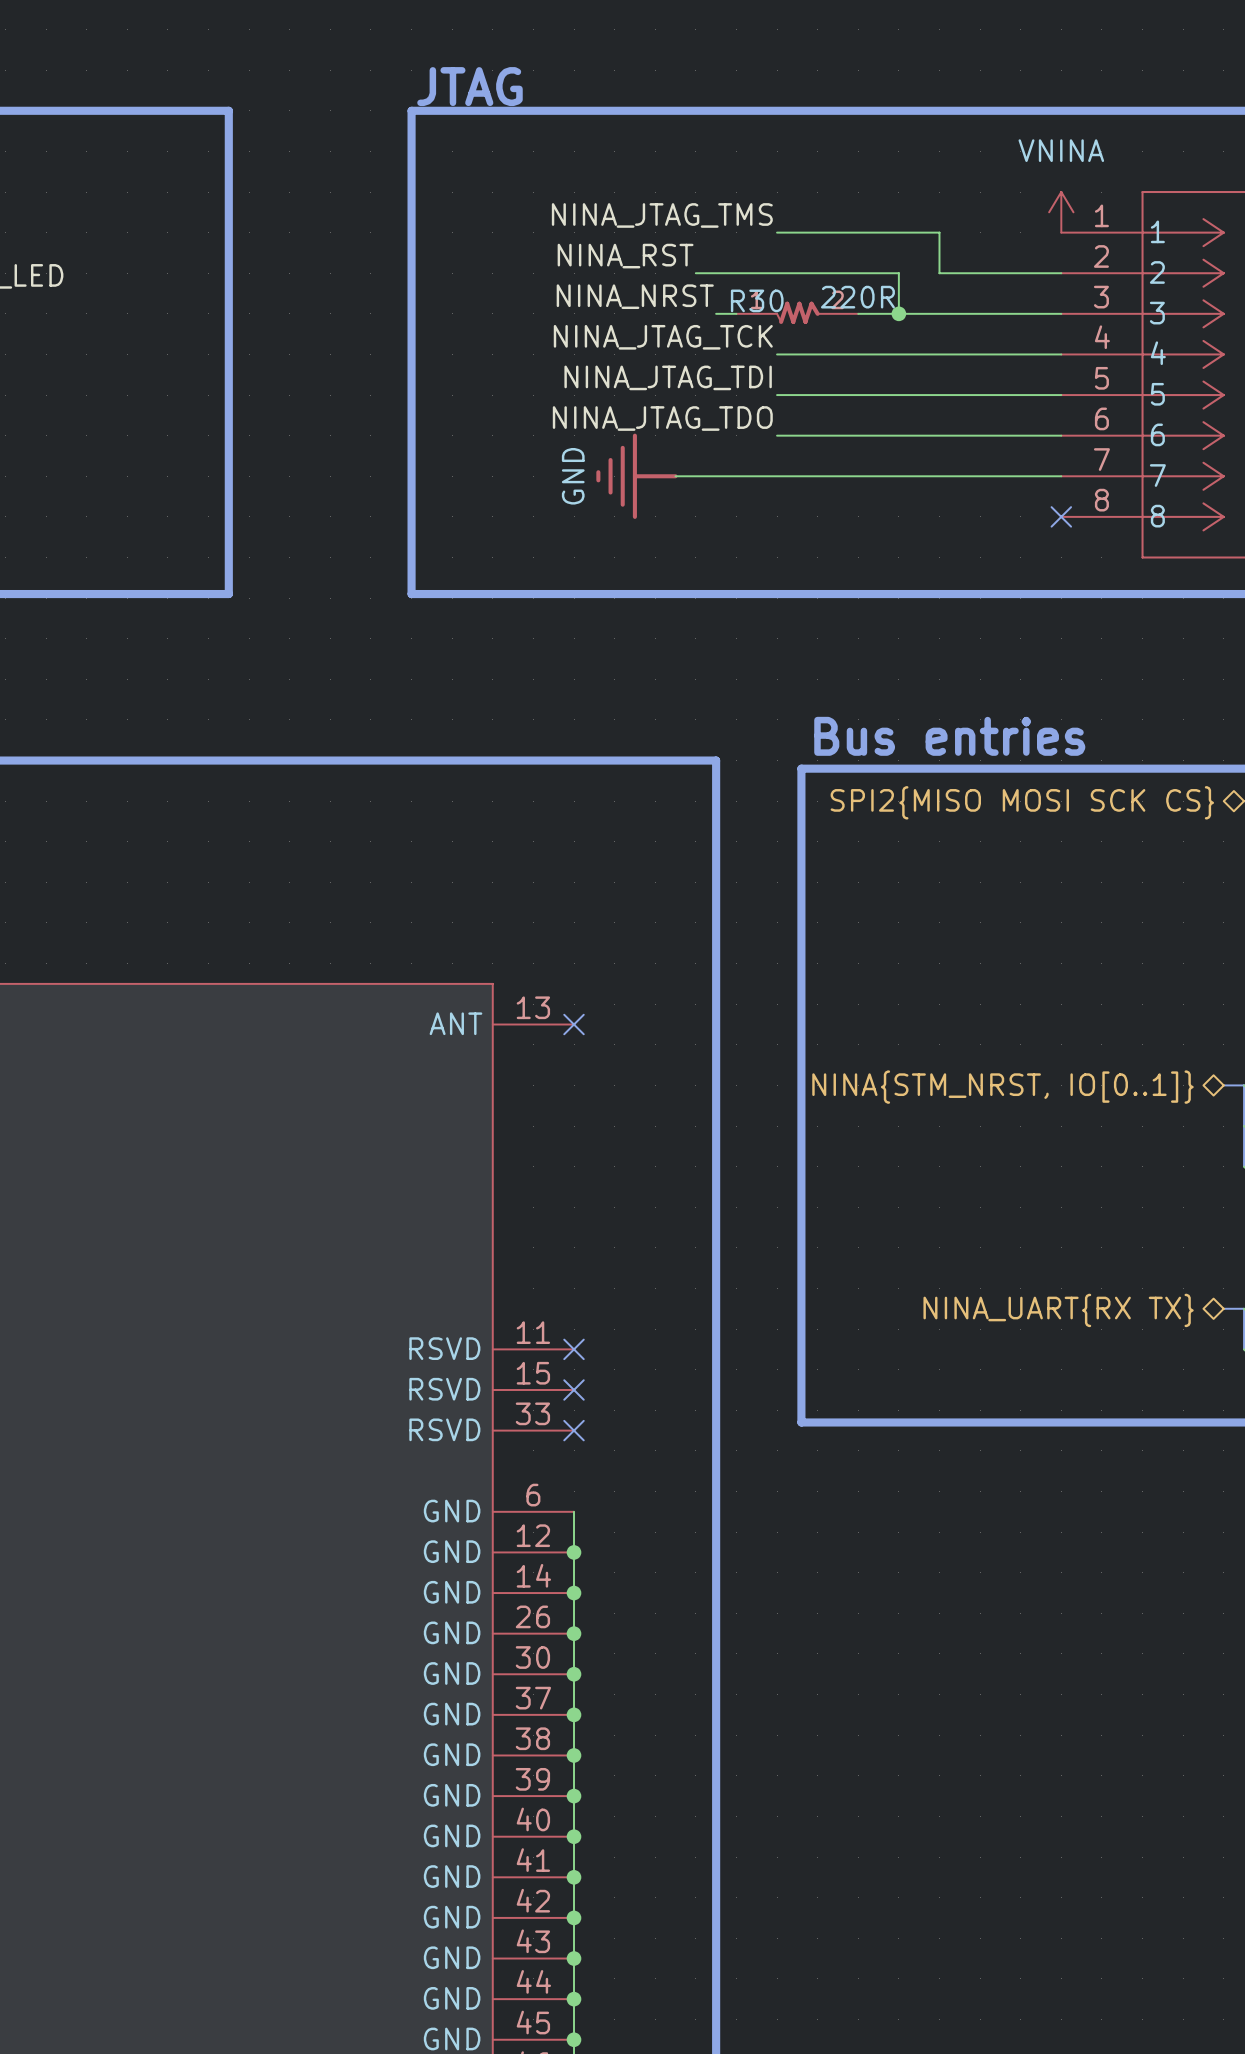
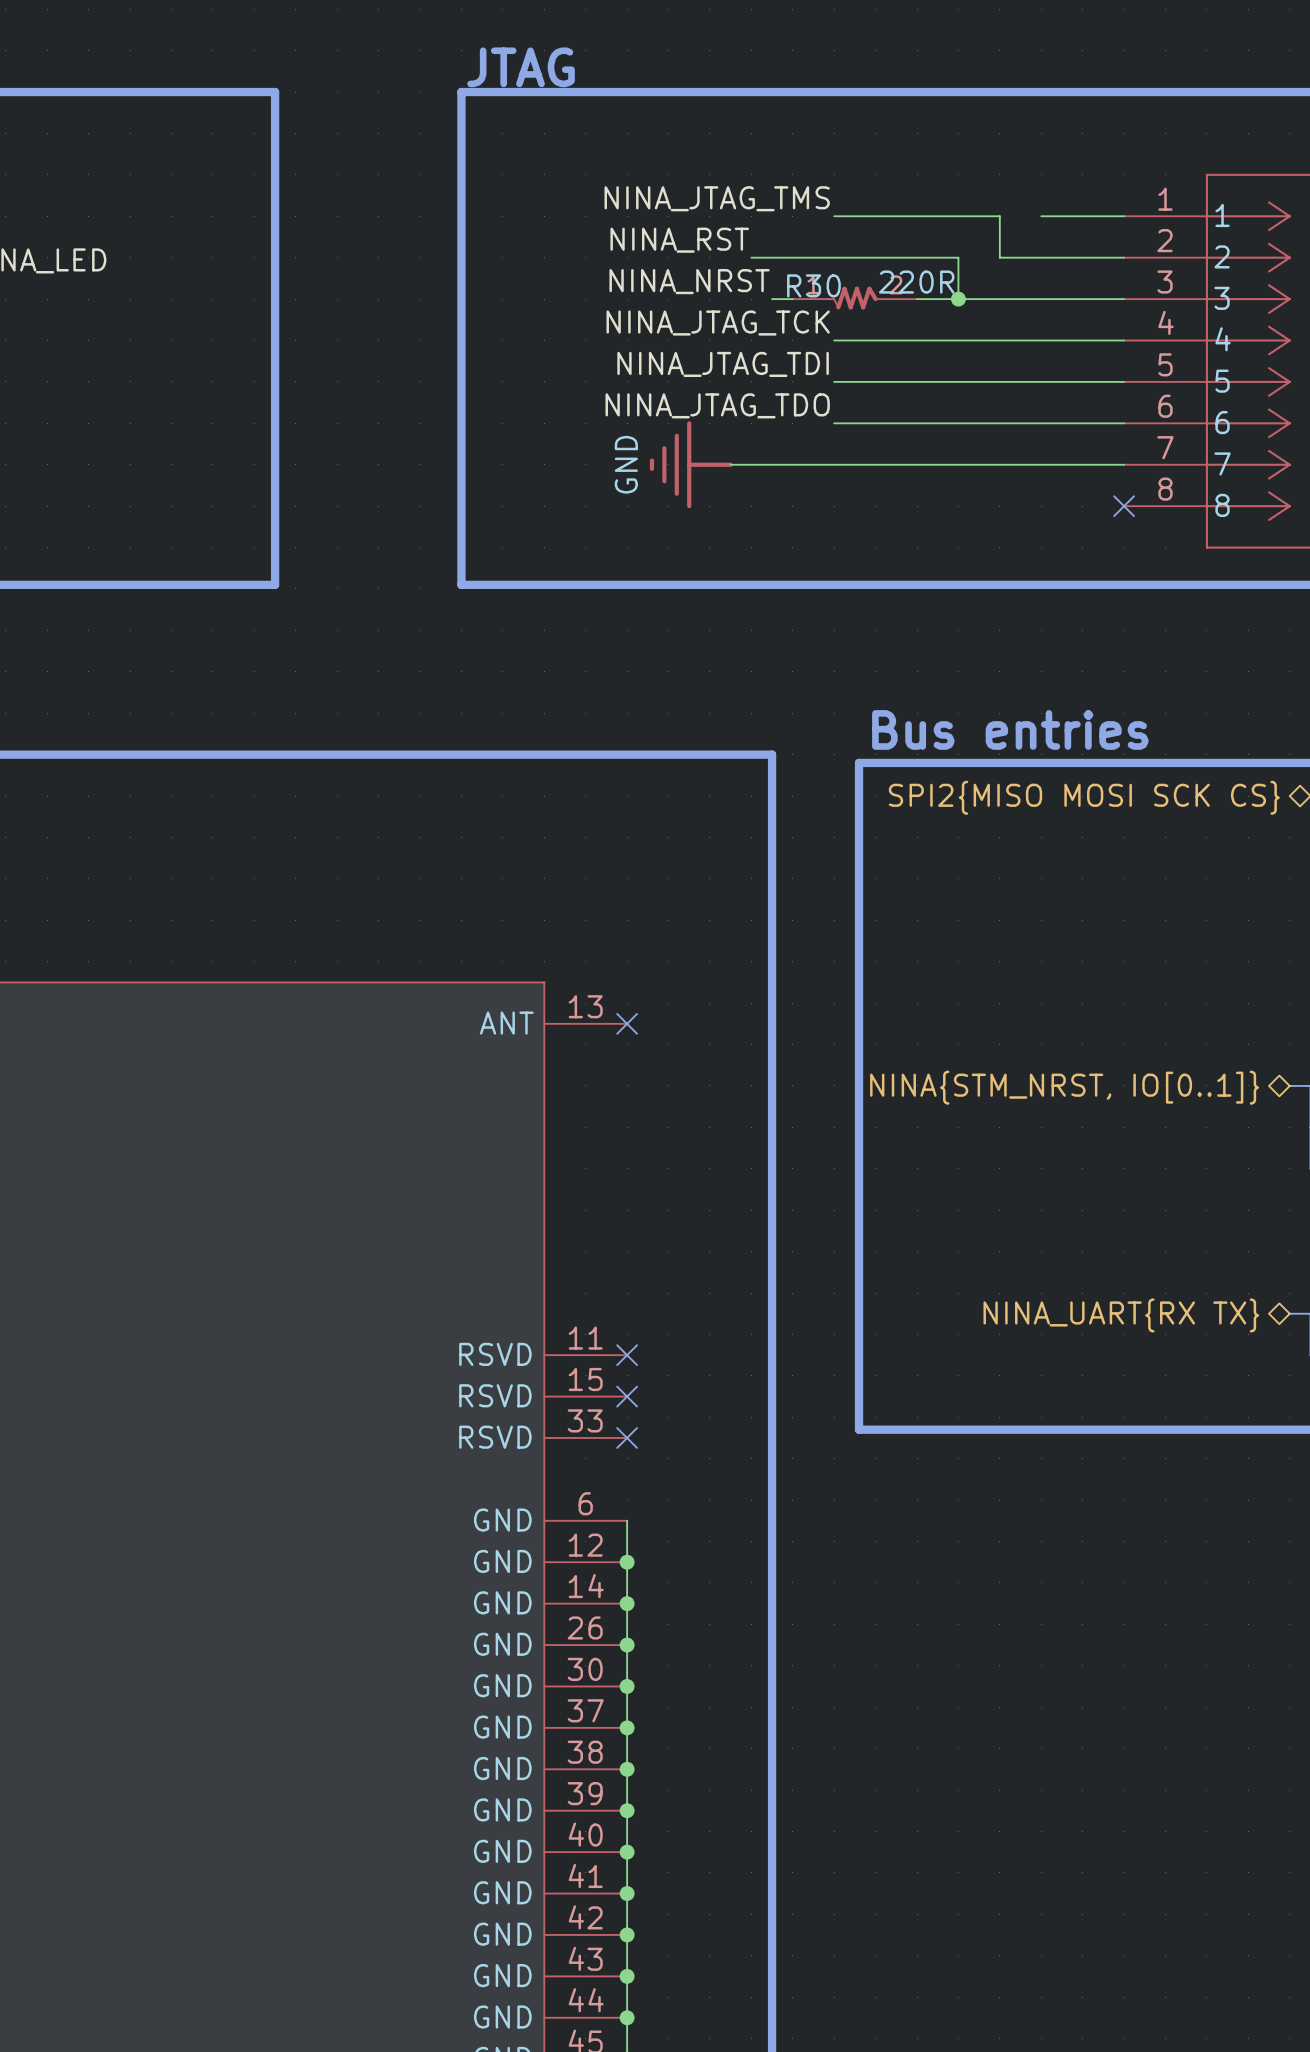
power symbol: VNINA (1061, 212) -> none
wire: none -> (1041, 216) (1124, 216)

